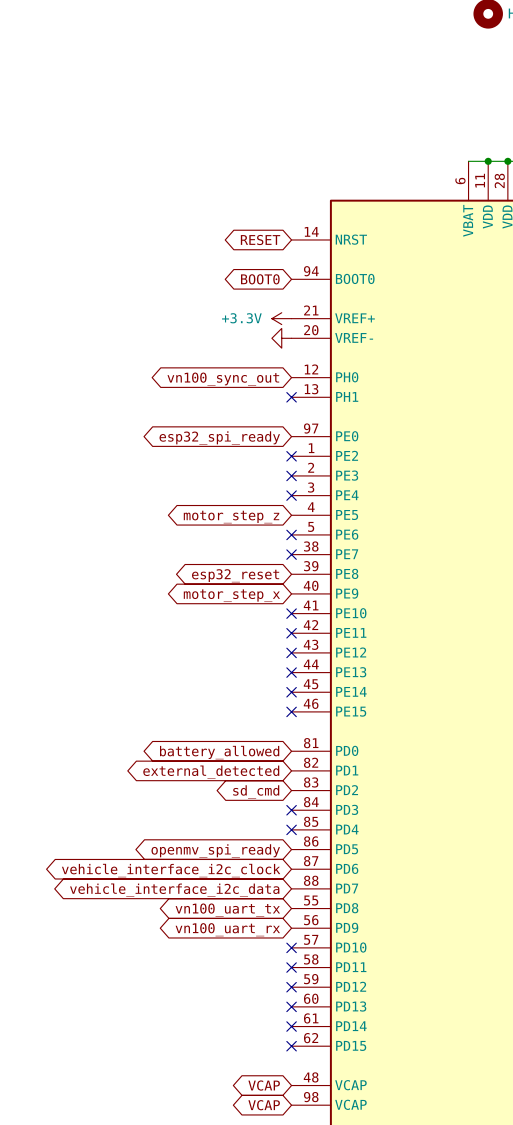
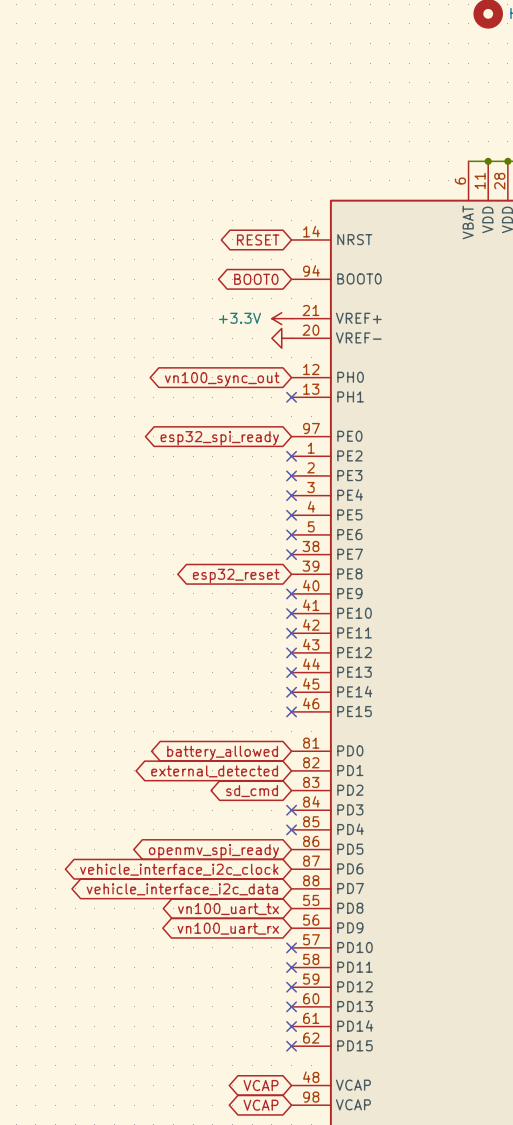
no-connect mark: none -> (291, 515)
global label: motor_step_z (231, 517) -> none
no-connect mark: none -> (291, 593)
global label: motor_step_x (231, 595) -> none

